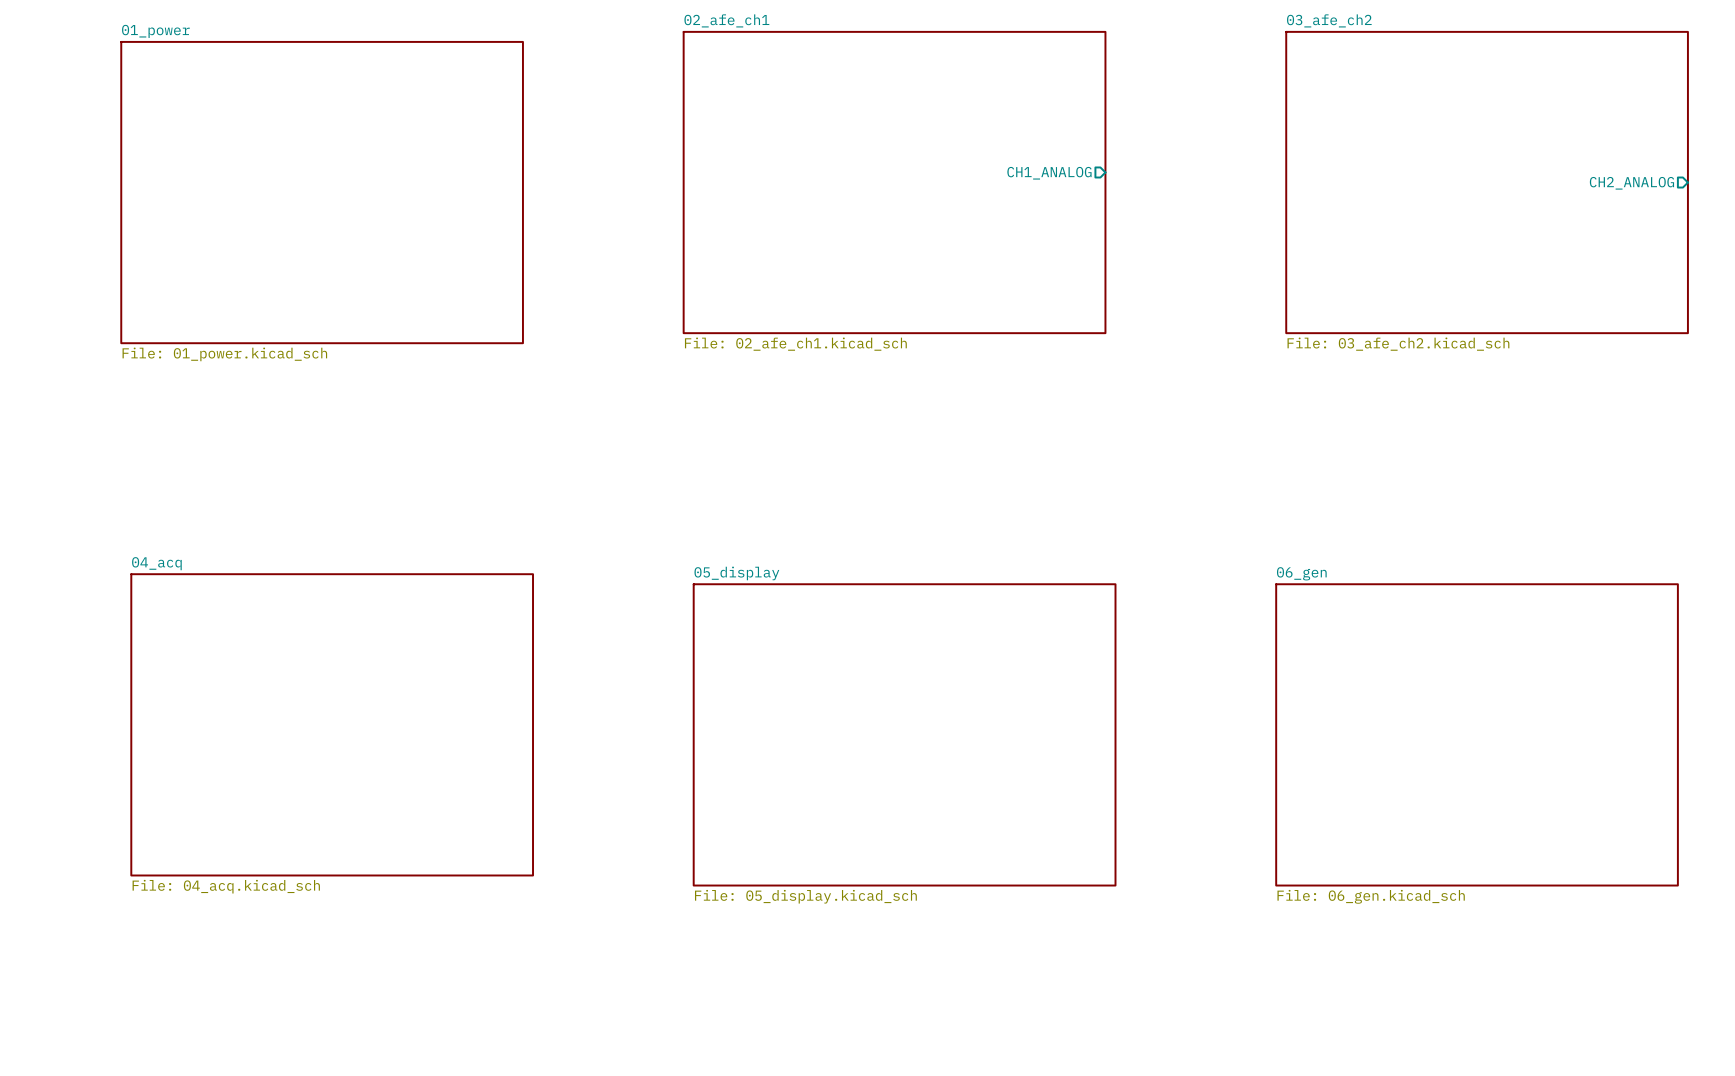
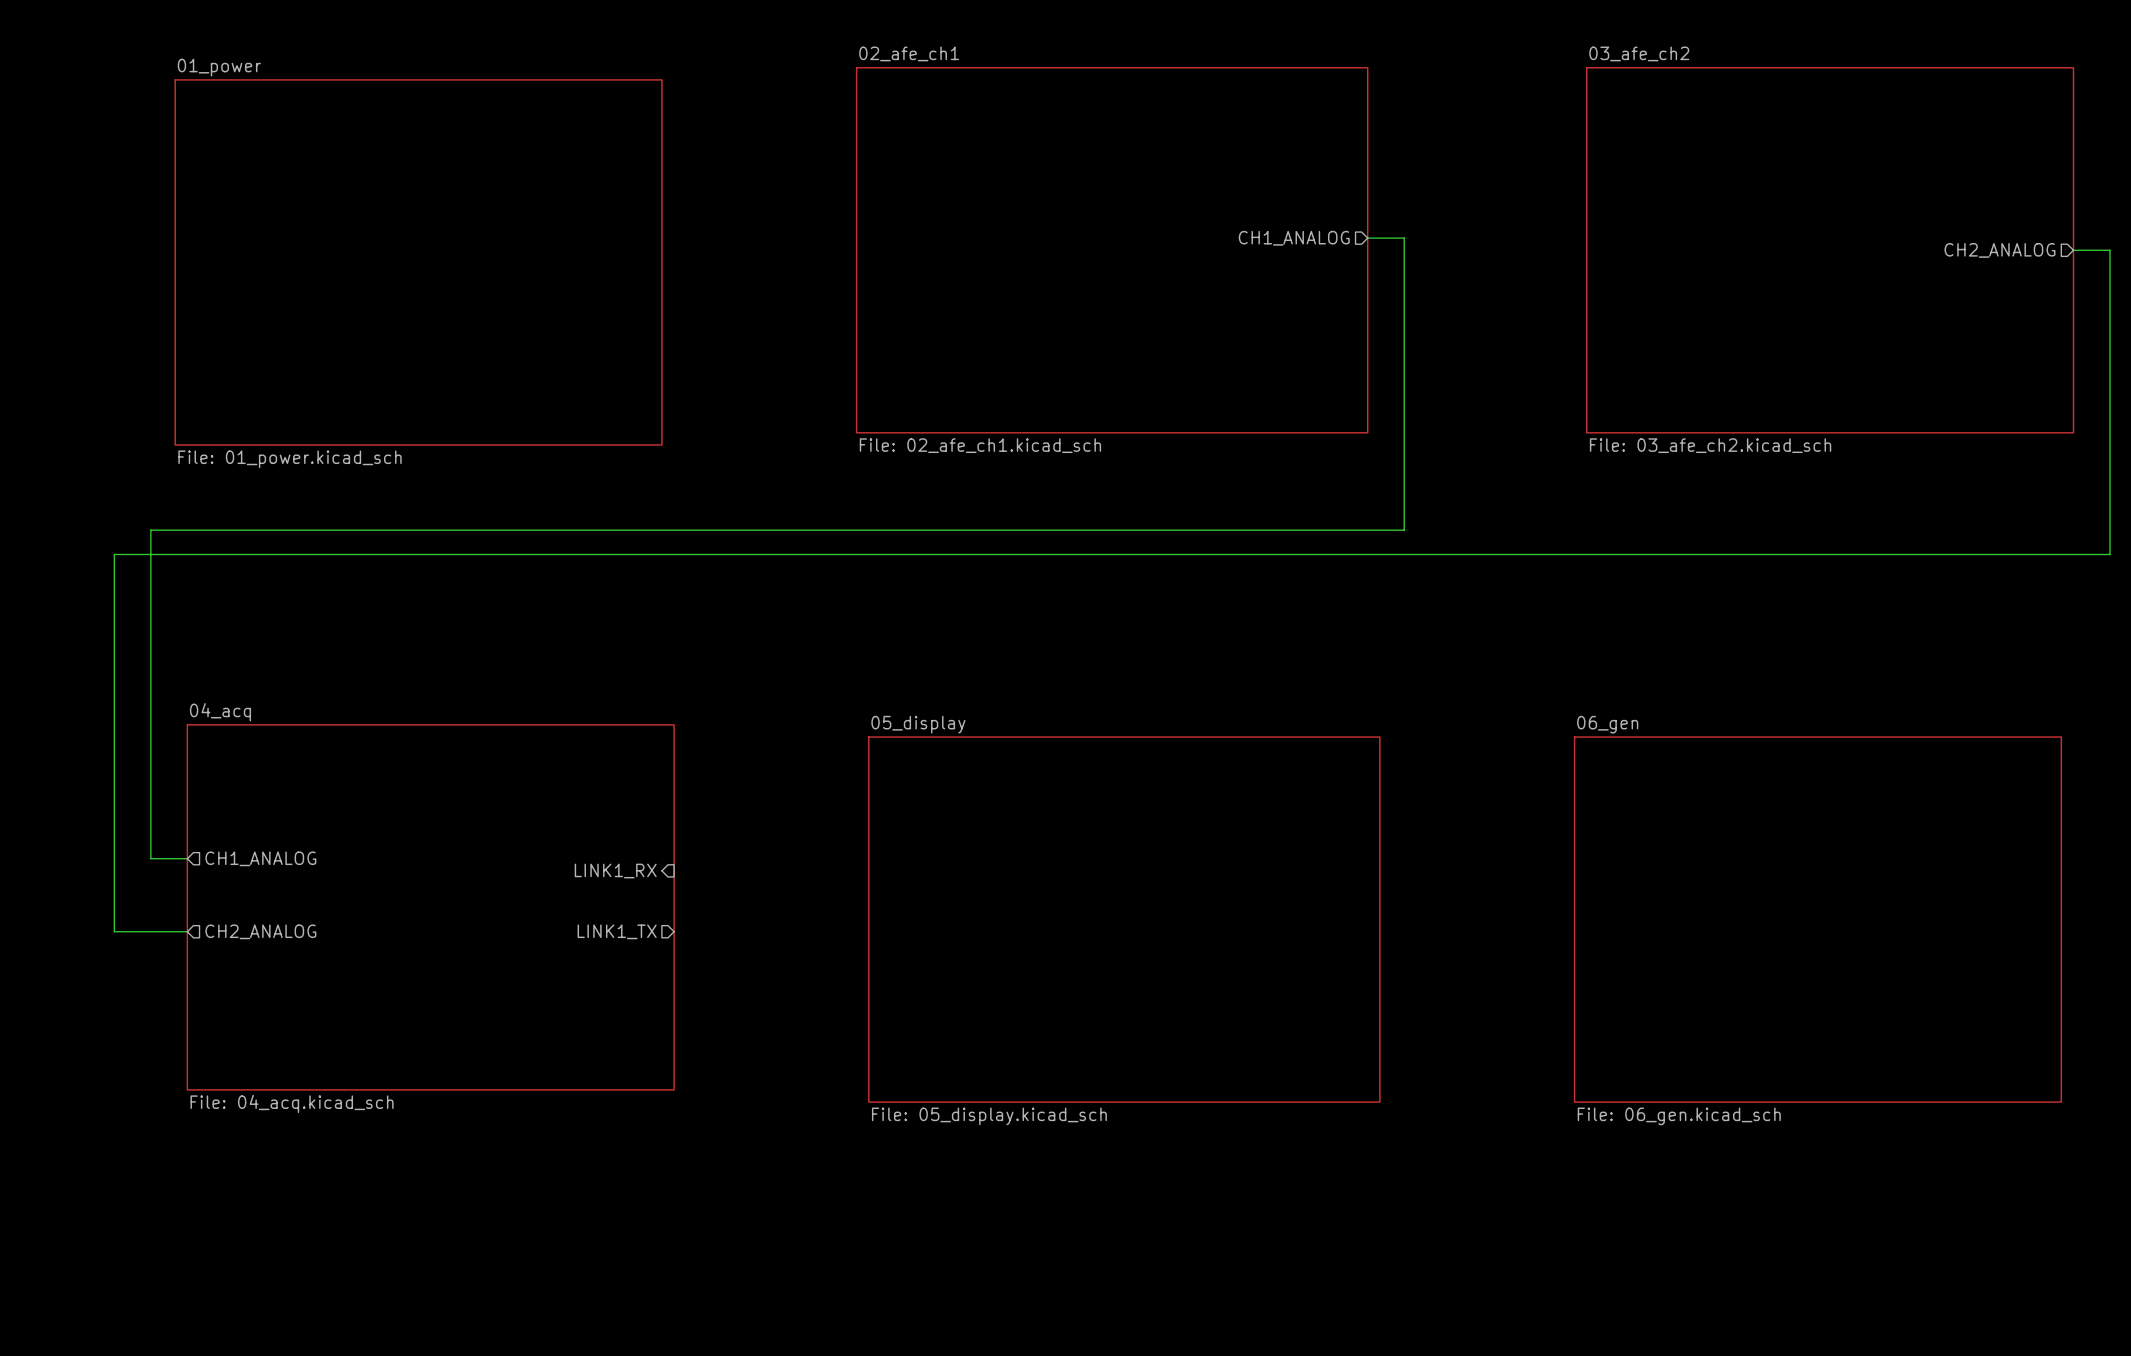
wire: none -> (1367, 238) (1404, 238) (1404, 530) (150, 530) (150, 858) (187, 858)
wire: none -> (2073, 250) (2109, 250) (2109, 554) (114, 554) (114, 931) (187, 931)
sheet pin: none -> CH1_ANALOG (260, 858)
sheet pin: none -> LINK1_RX (615, 871)
sheet pin: none -> CH2_ANALOG (260, 931)
sheet pin: none -> LINK1_TX (617, 931)

